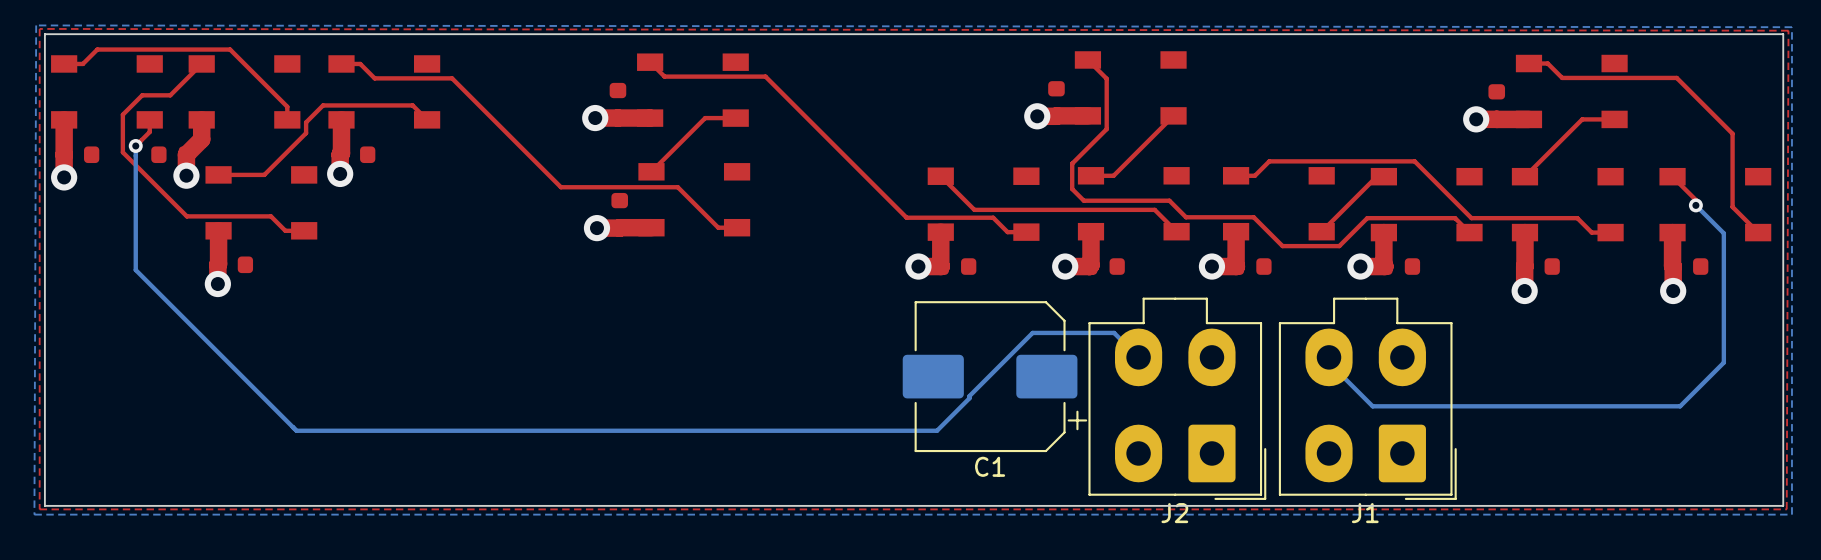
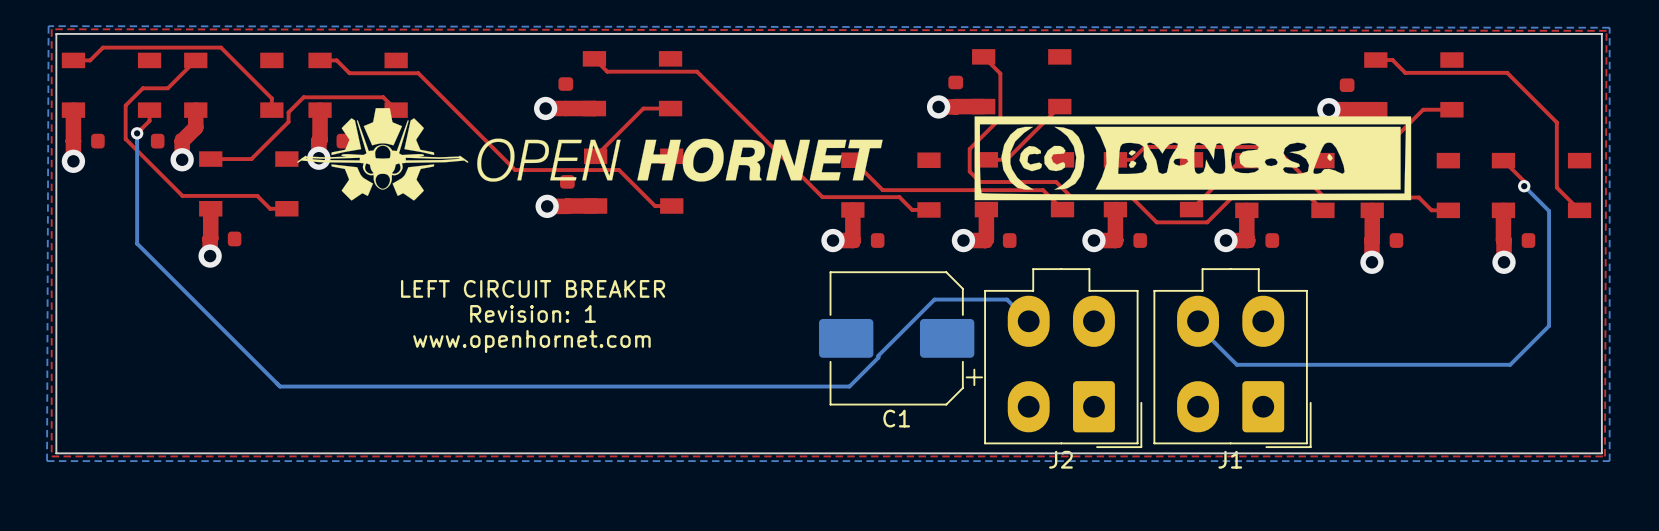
drawing: none -> [297, 108, 883, 201]
drawing: none -> [974, 116, 1412, 201]
text: none -> LEFT CIRCUIT BREAKER (533, 288)
text: none -> Revision: 1 (533, 313)
text: none -> www.openhornet.com (531, 341)

